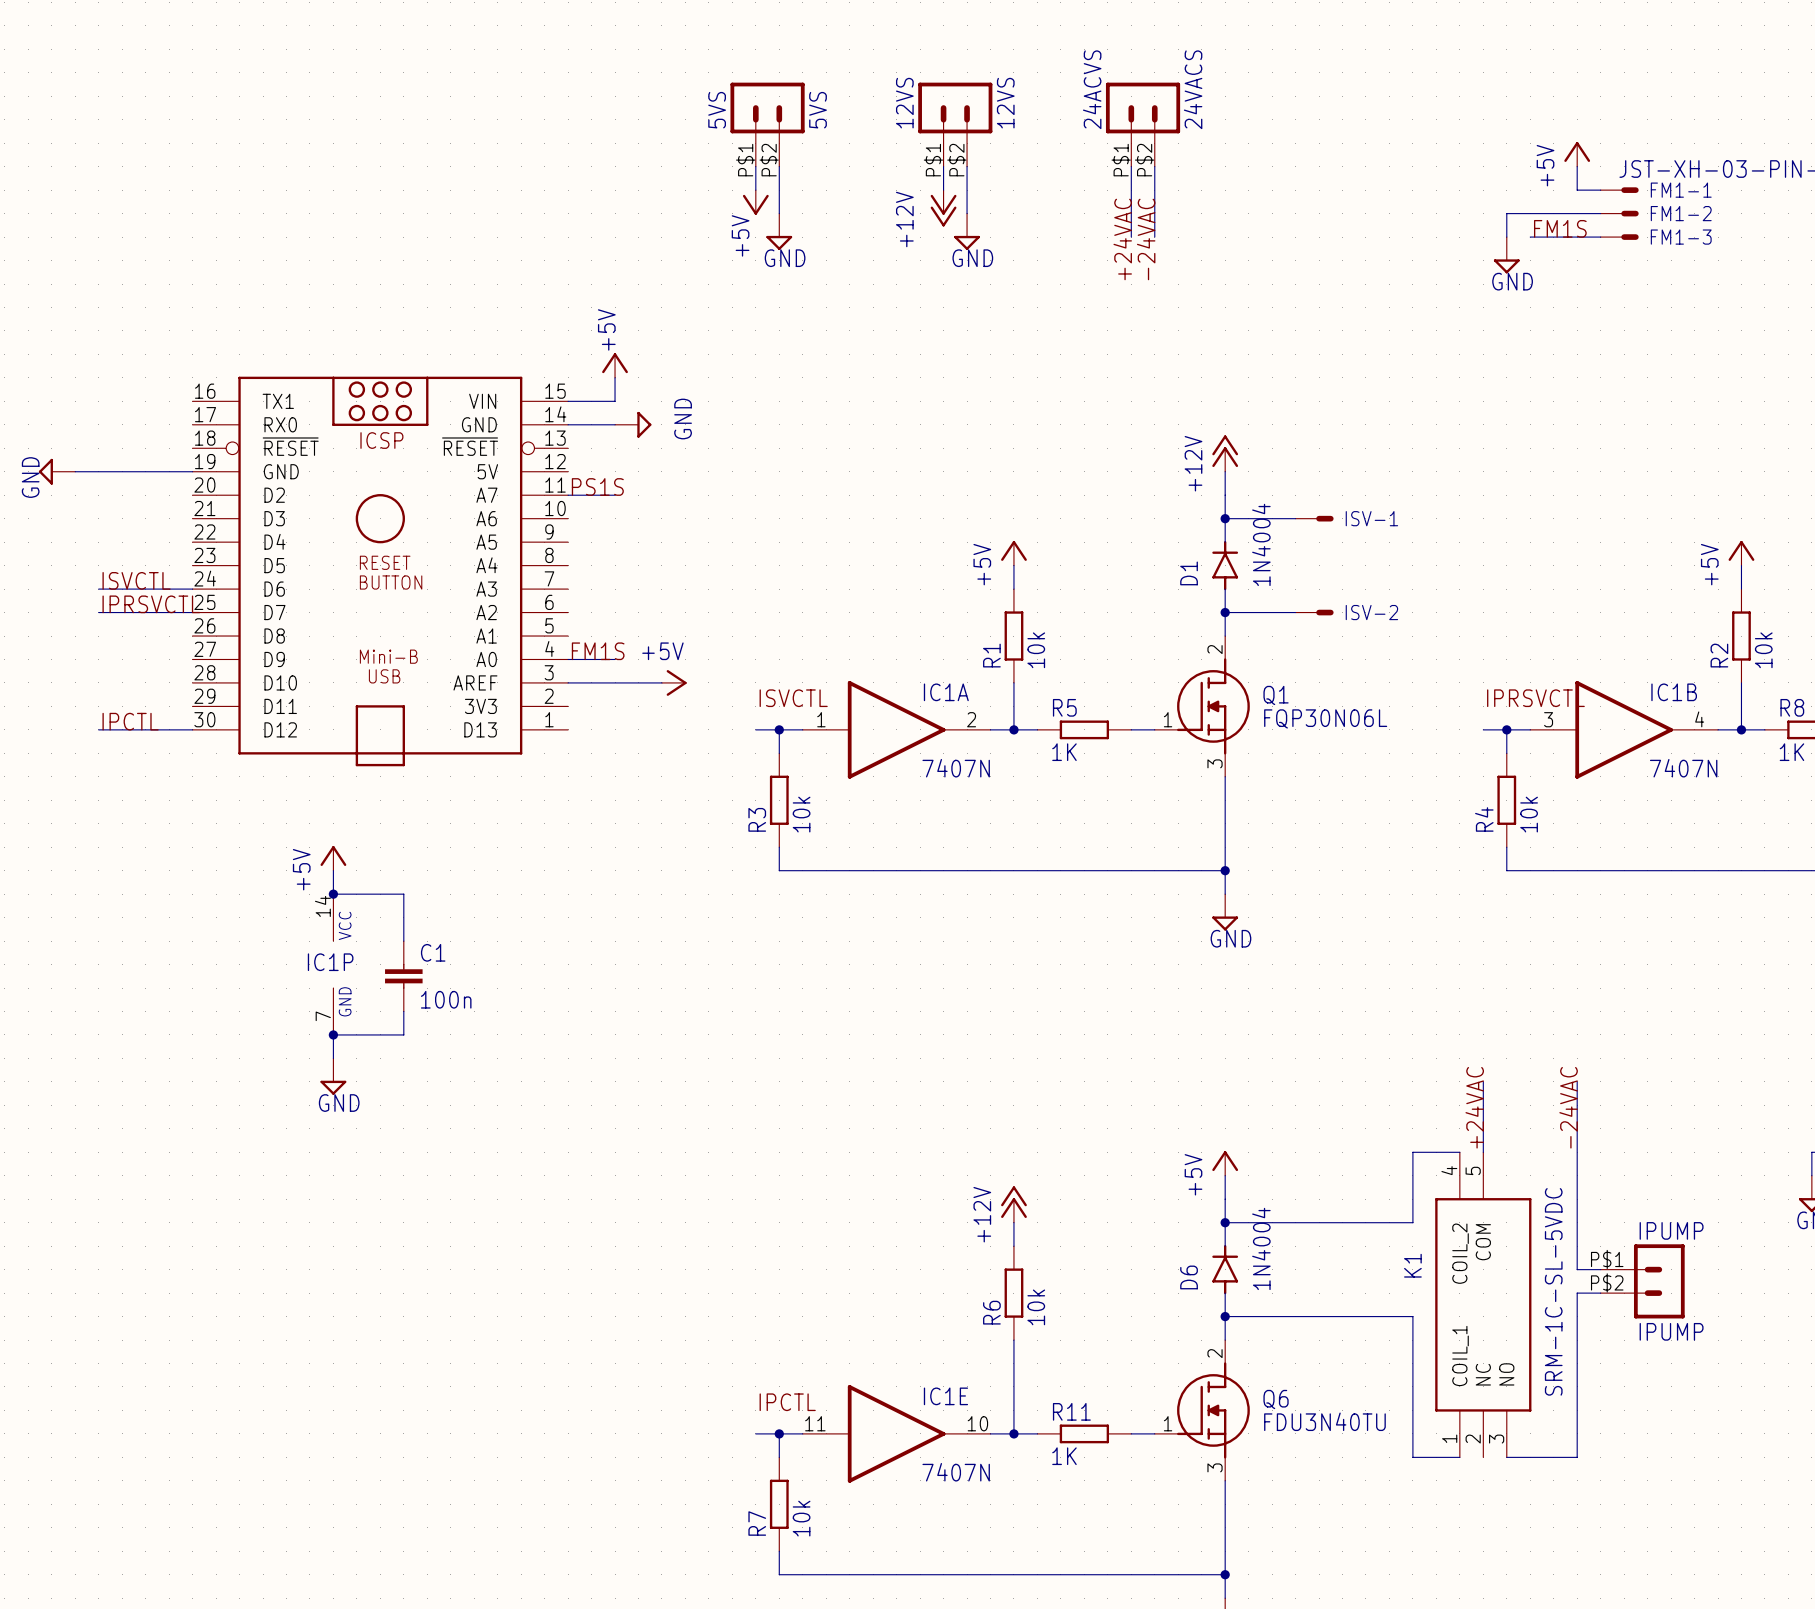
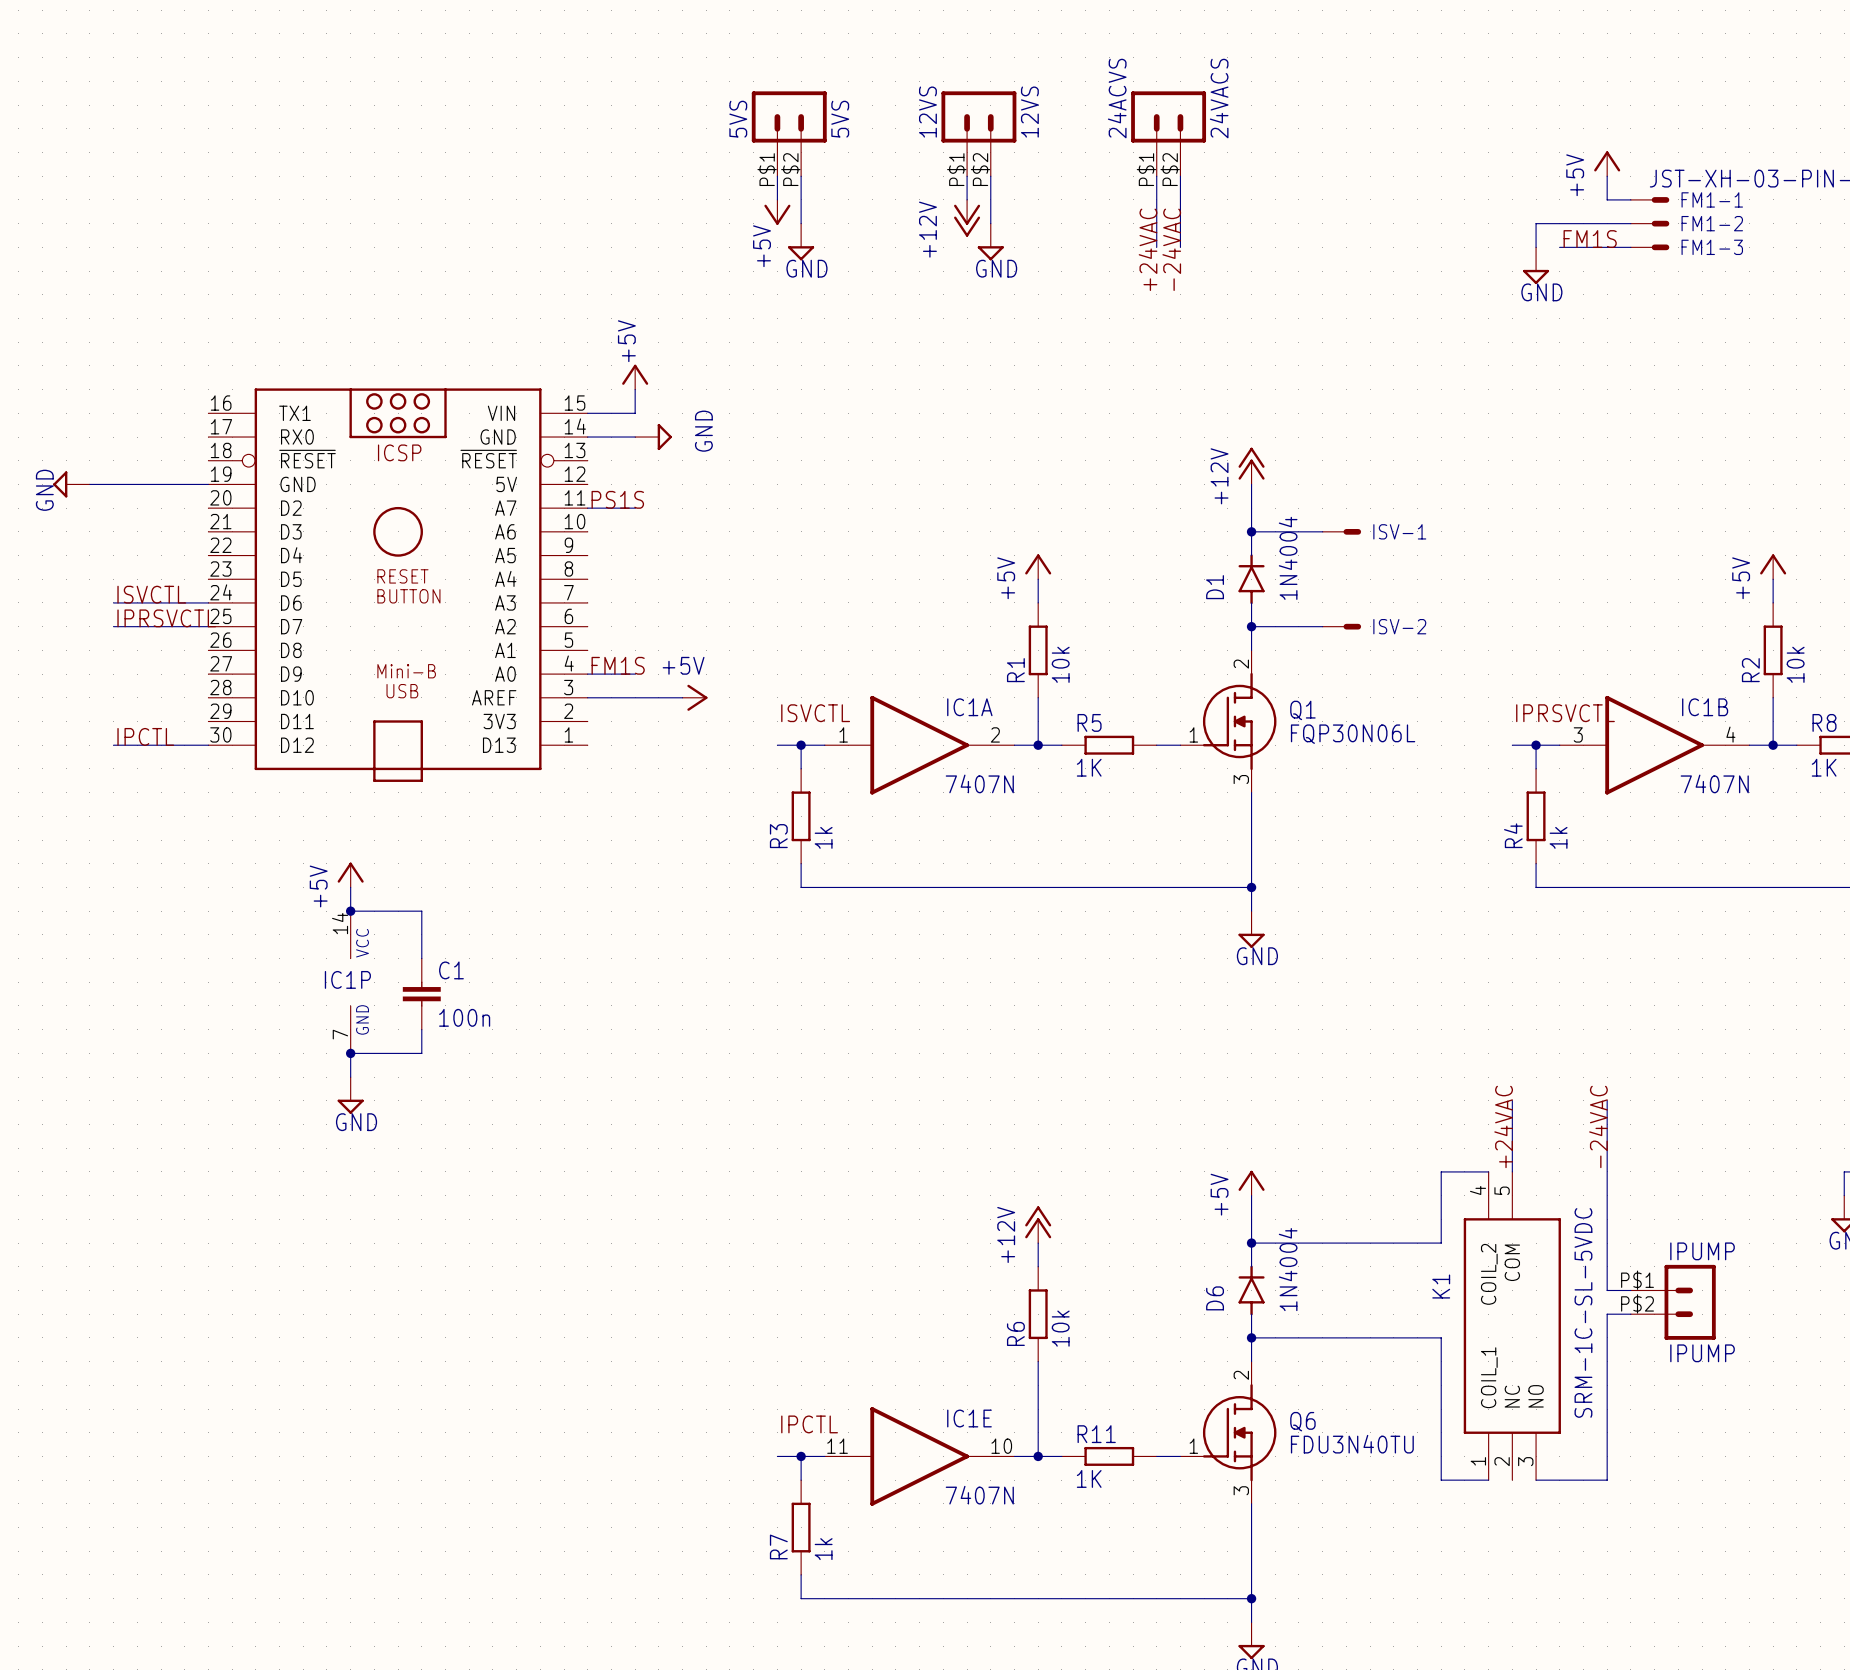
R3 value: 10k (801, 814) -> 1k (823, 837)
R4 value: 10k (1529, 814) -> 1k (1558, 837)
R7 value: 10k (801, 1518) -> 1k (823, 1549)

